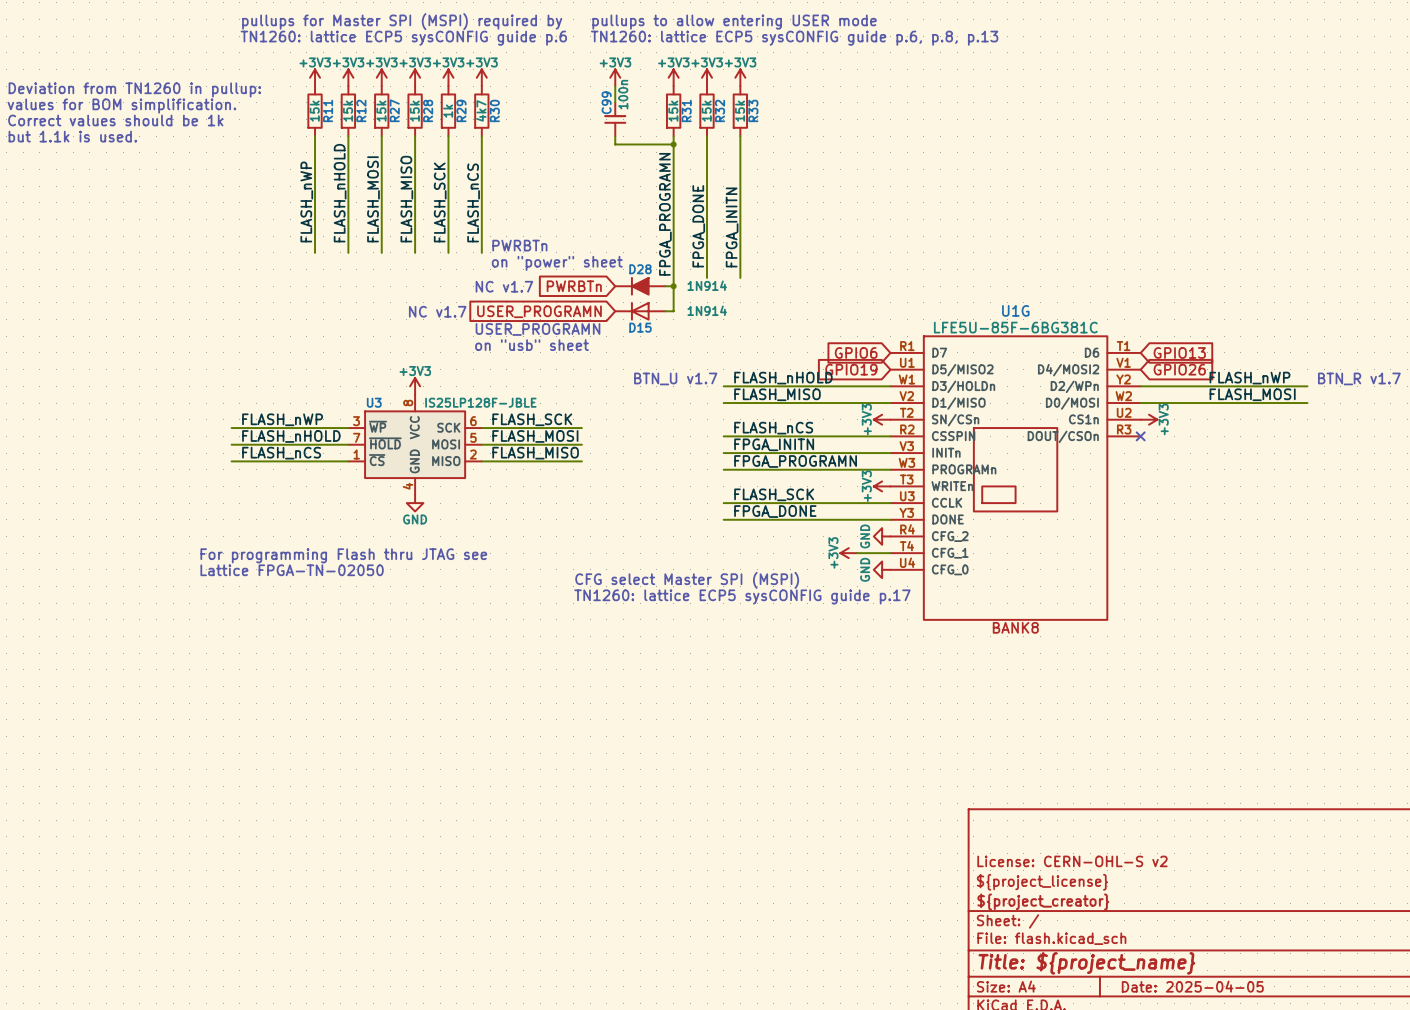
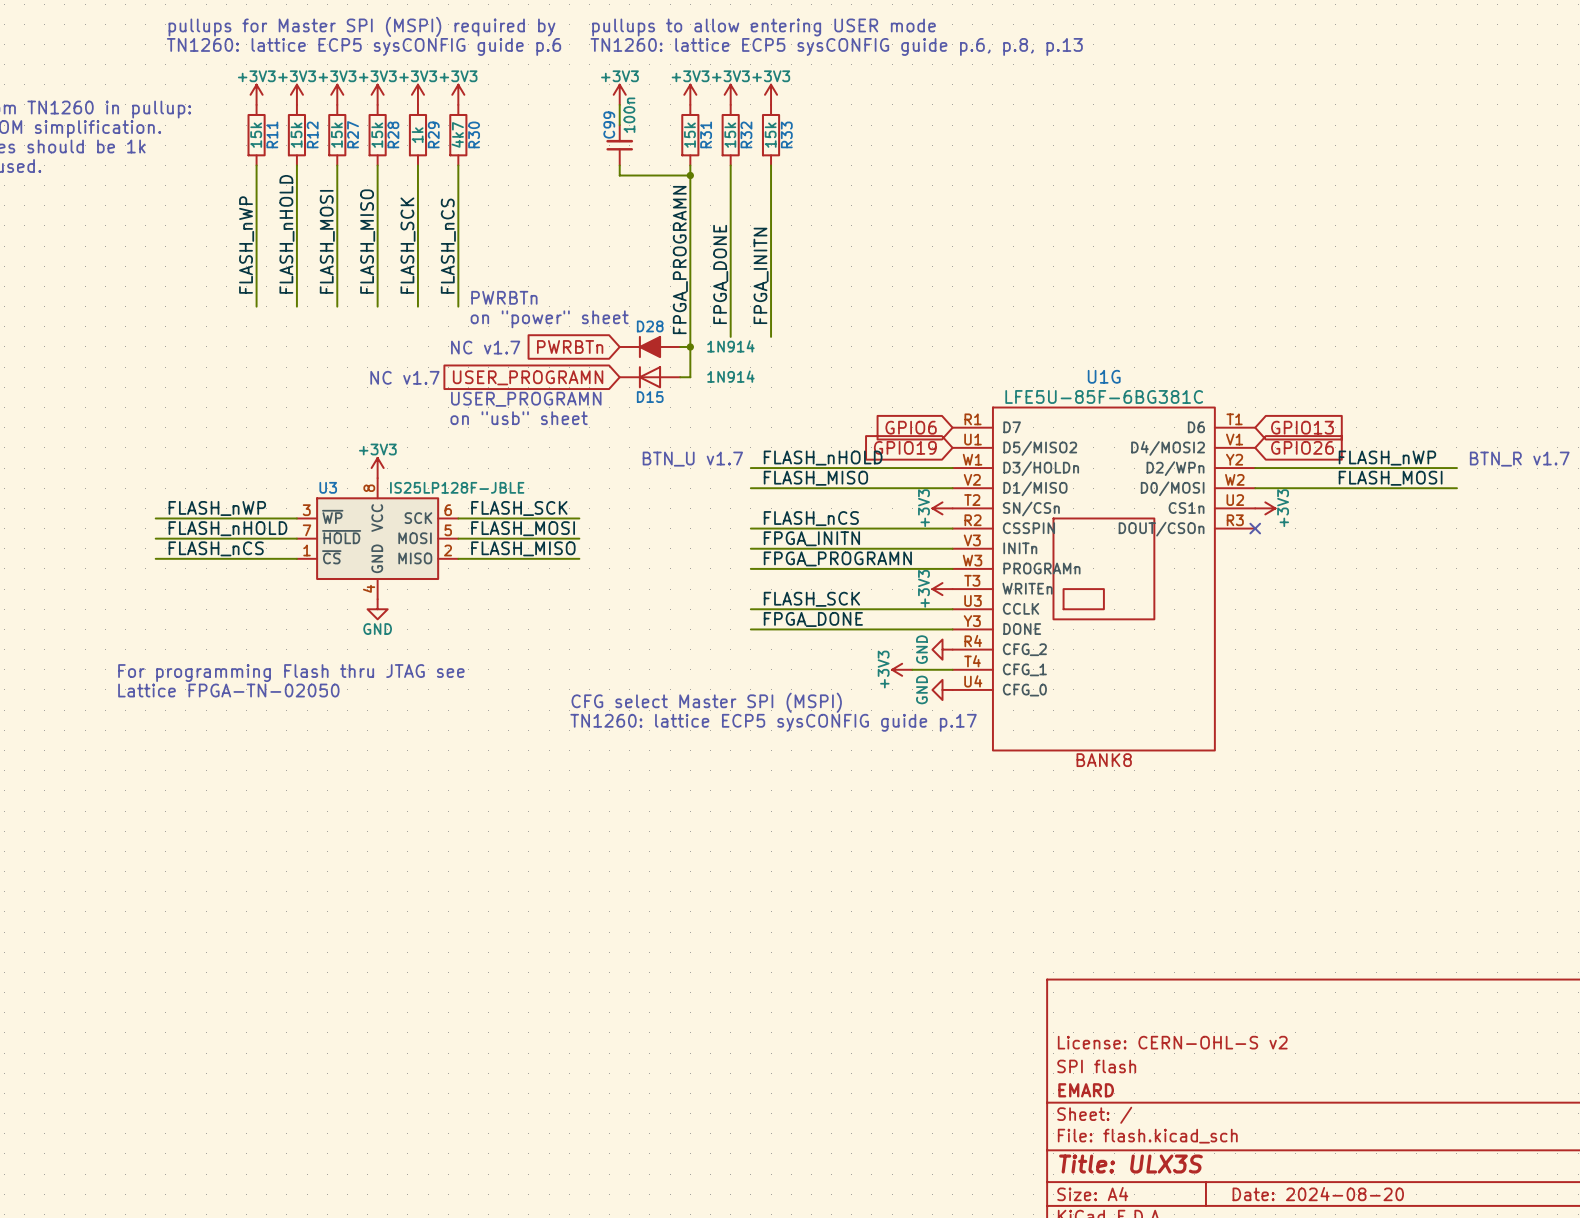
title block: ${project_license} (1042, 882) -> SPI flash (1096, 1066)
title block: ${project_creator} (1043, 901) -> EMARD (1086, 1090)
title block: Title: ${project_name} (1086, 963) -> Title: ULX3S (1130, 1164)
title block: Date: 2025-04-05 (1192, 986) -> Date: 2024-08-20 (1318, 1194)

